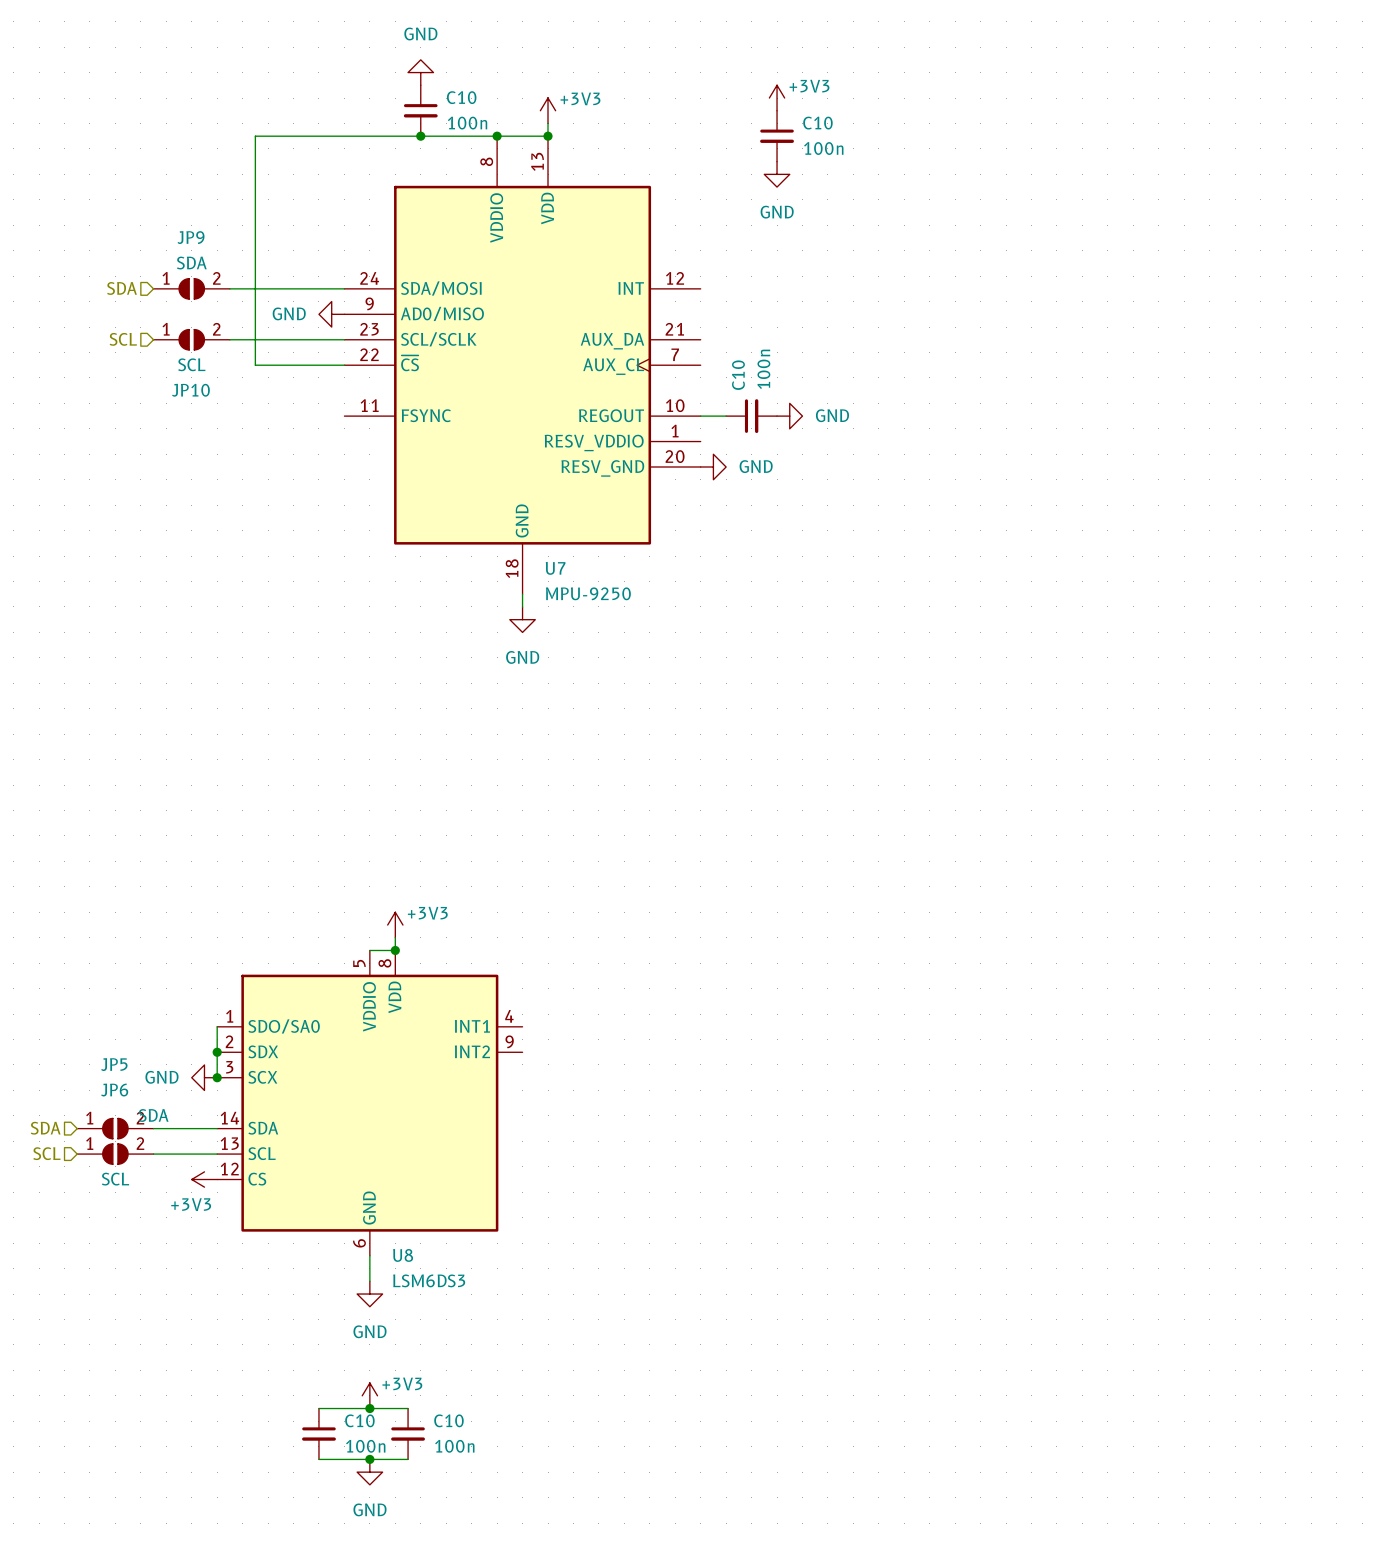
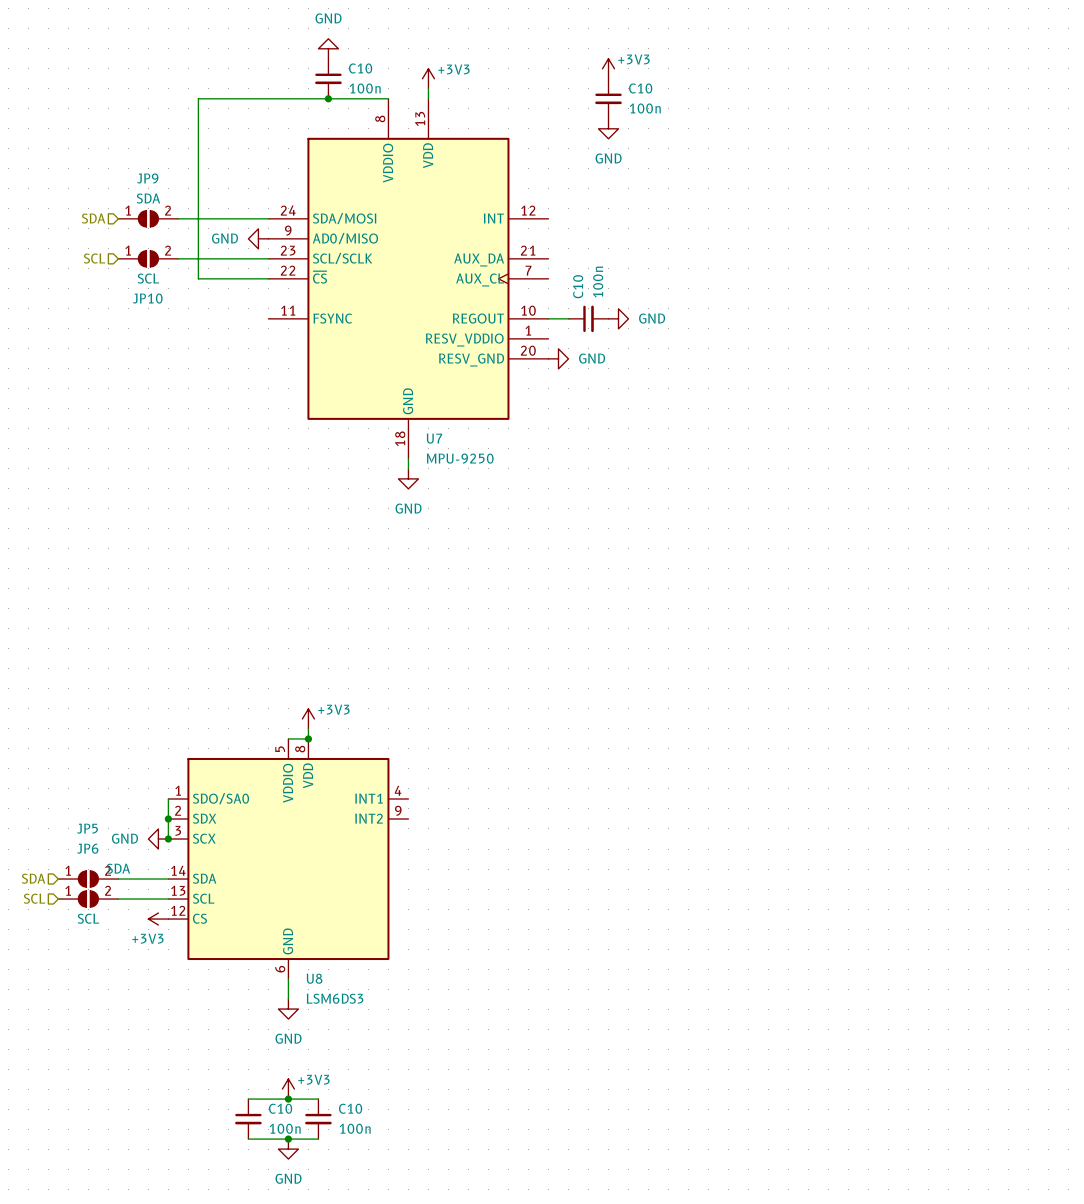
wire: (497, 136) (548, 136) -> none
junction: (497, 136) -> none
junction: (548, 136) -> none

